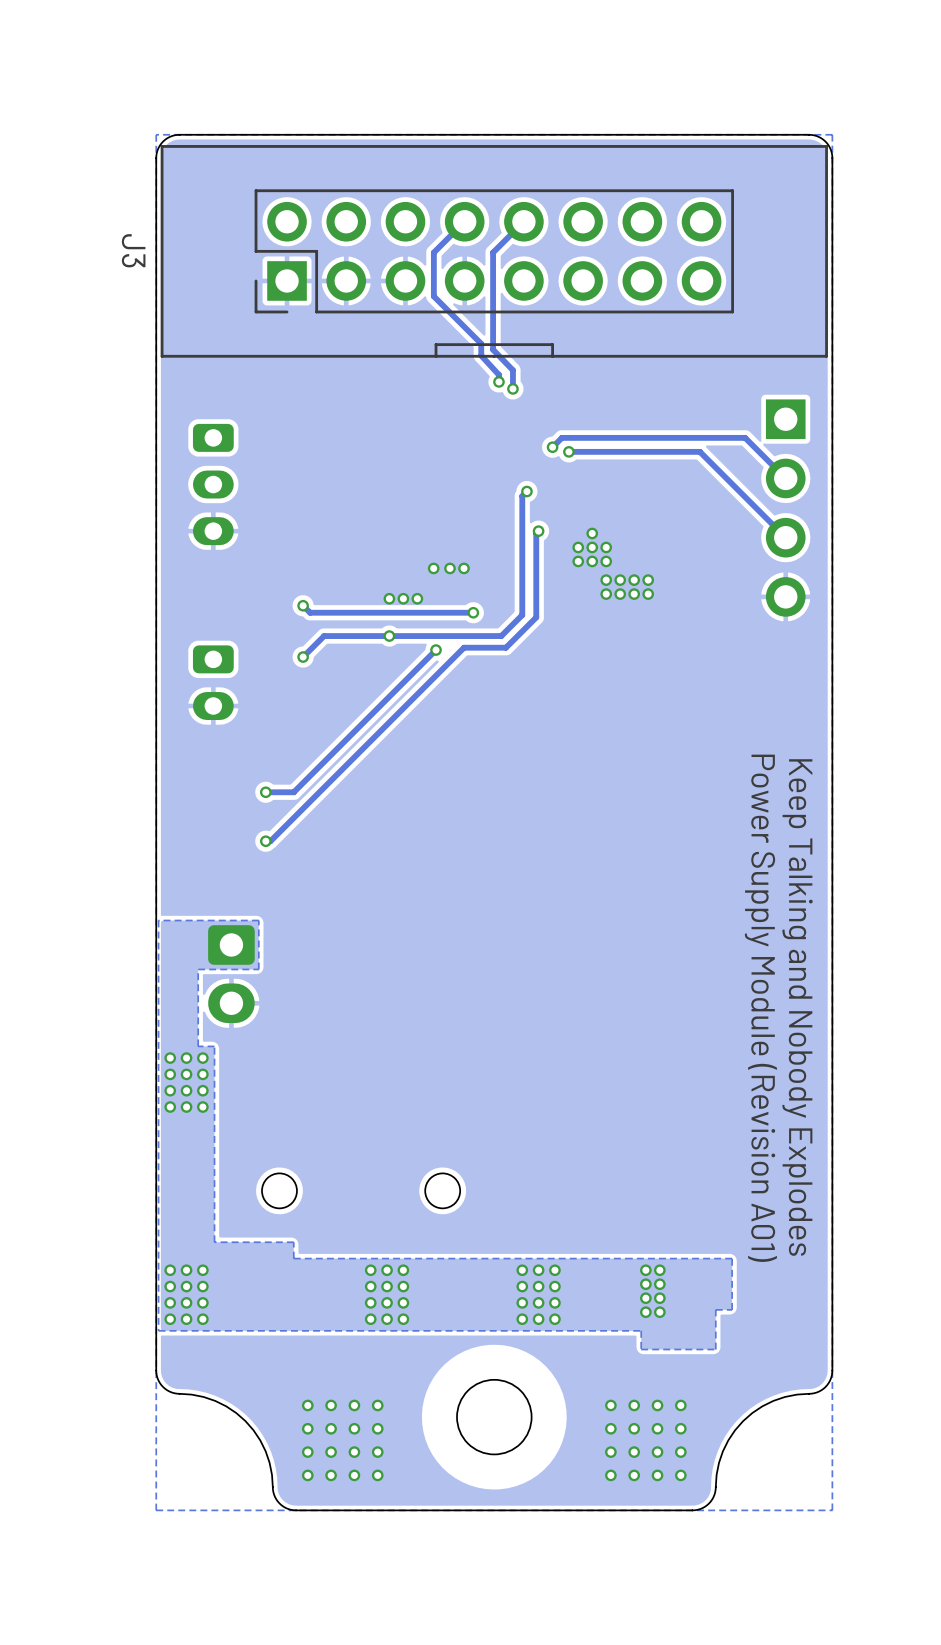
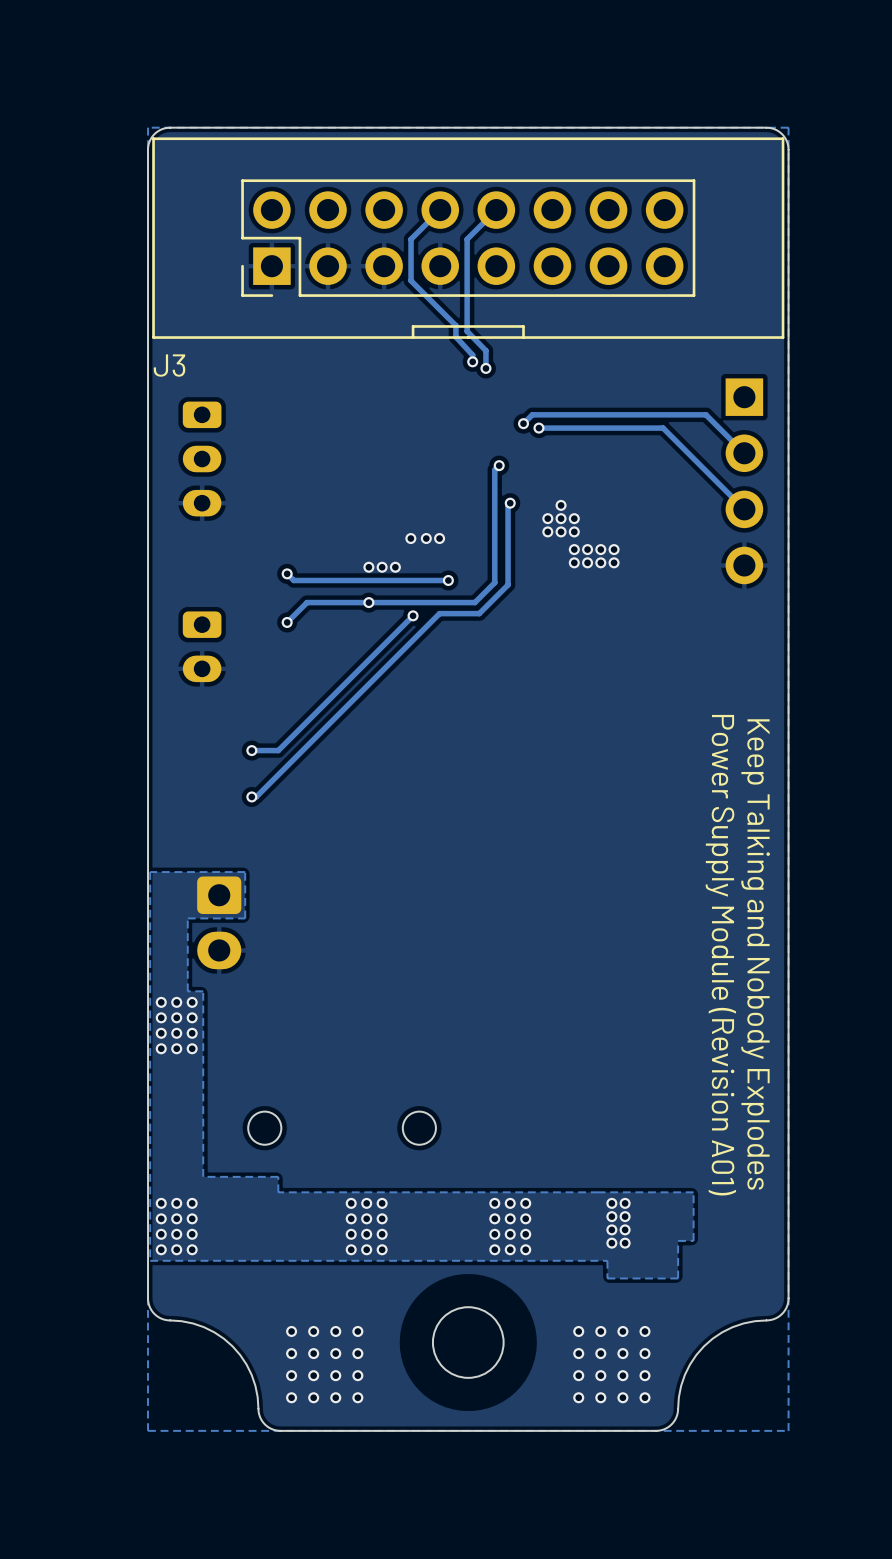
J3 name rotation: 0° (133, 250) -> 90° counterclockwise (169, 365)
J3 name position: J3 (133, 250) -> J3 (169, 365)

